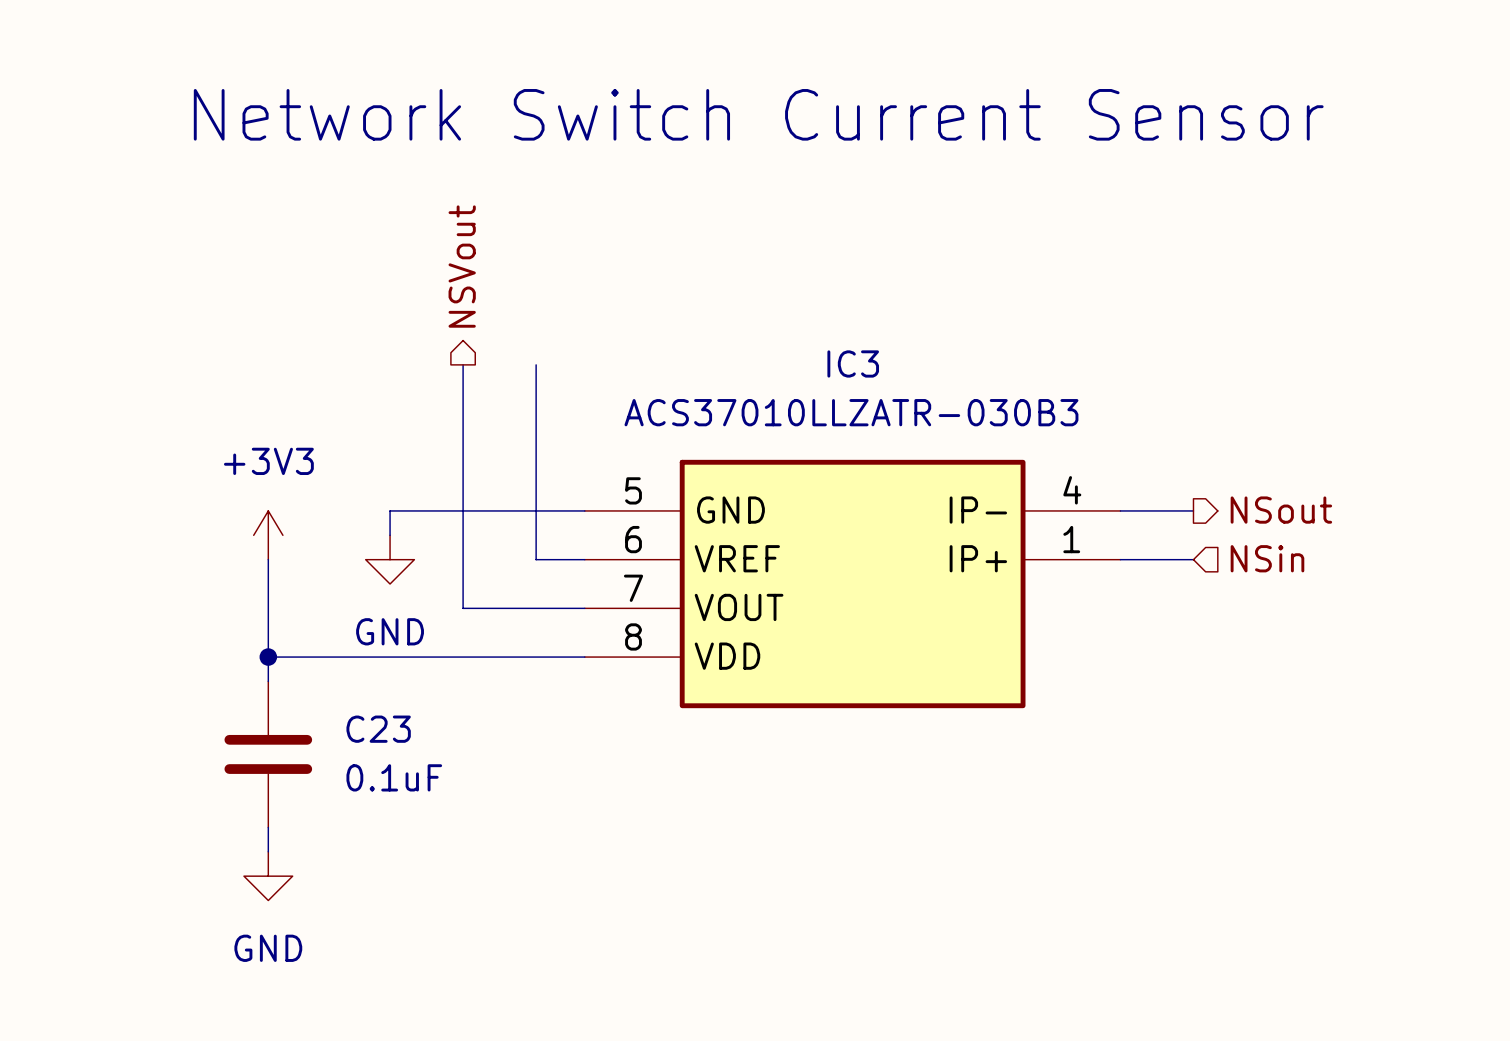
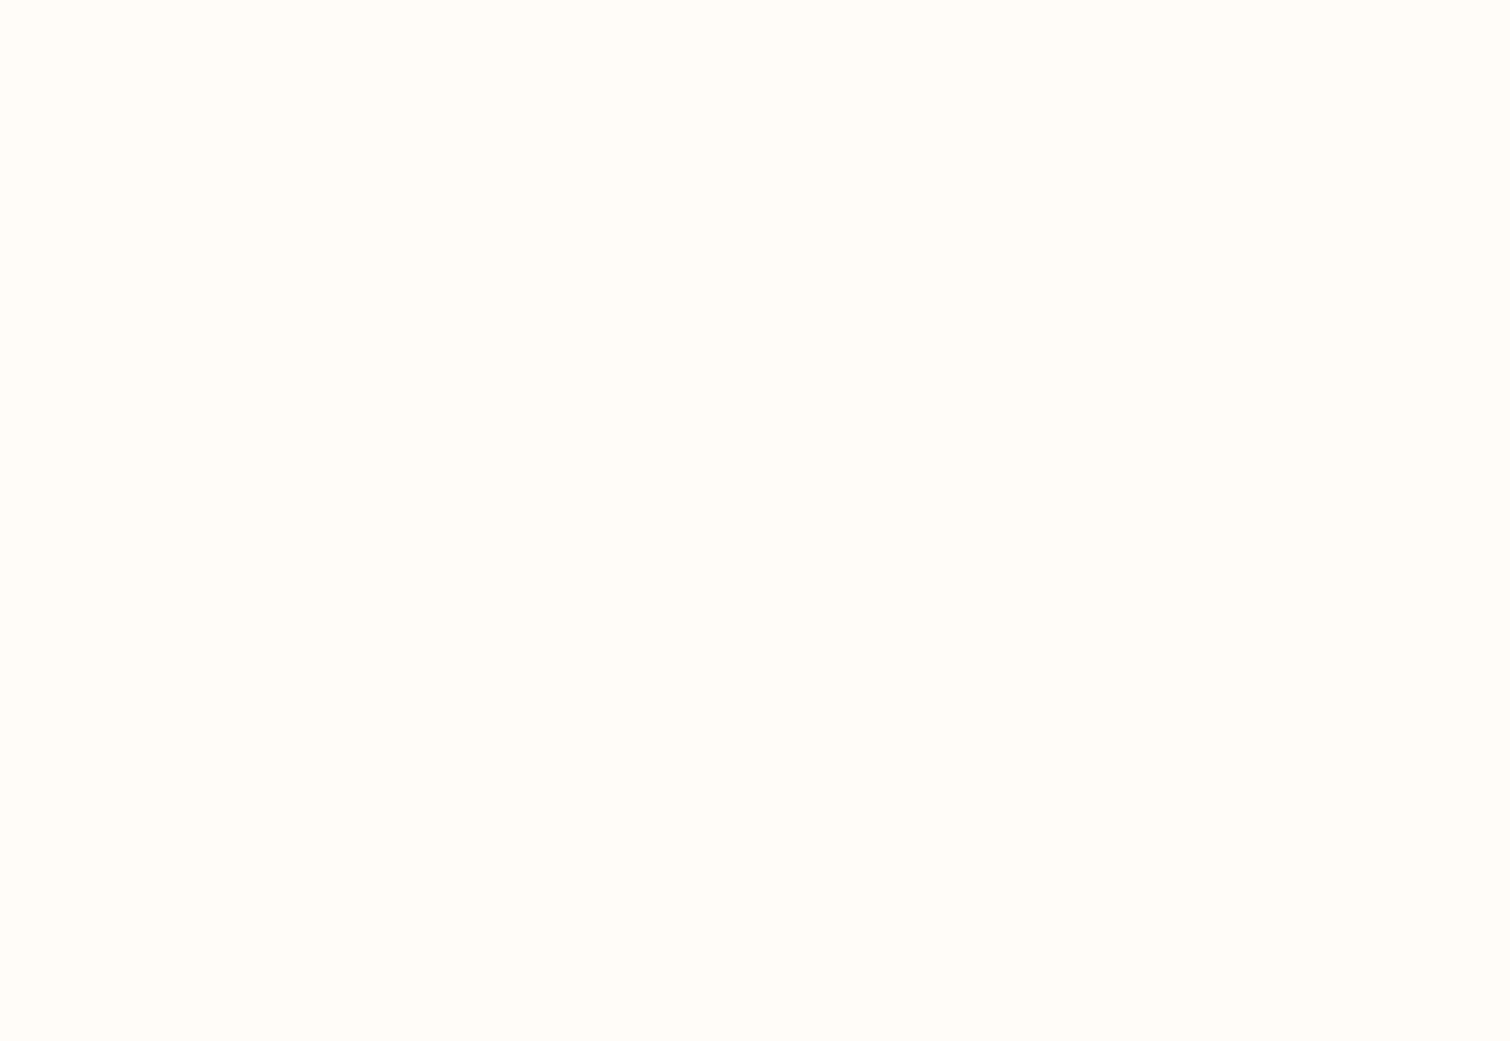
text: Network Switch Current Sensor (758, 114) -> none
hierarchical label: NSVout (462, 266) -> none
wire: (463, 364) (463, 608) (584, 608) -> none
wire: (536, 364) (536, 559) (584, 559) -> none
wire: (584, 510) (390, 510) (390, 535) -> none
wire: (1120, 510) (1193, 510) -> none
hierarchical label: NSout (1281, 510) -> none
power symbol: +3V3 (268, 535) -> none
hierarchical label: NSin (1267, 558) -> none
wire: (268, 559) (268, 681) -> none
power symbol: GND (390, 559) -> none
wire: (1120, 559) (1193, 559) -> none
IC3: ACS37010LLZATR-030B3 (852, 584) -> none
wire: (268, 657) (584, 657) -> none
junction: (268, 657) -> none
C23: 0.1uF (268, 754) -> none
wire: (268, 827) (268, 851) -> none
power symbol: GND (268, 876) -> none

